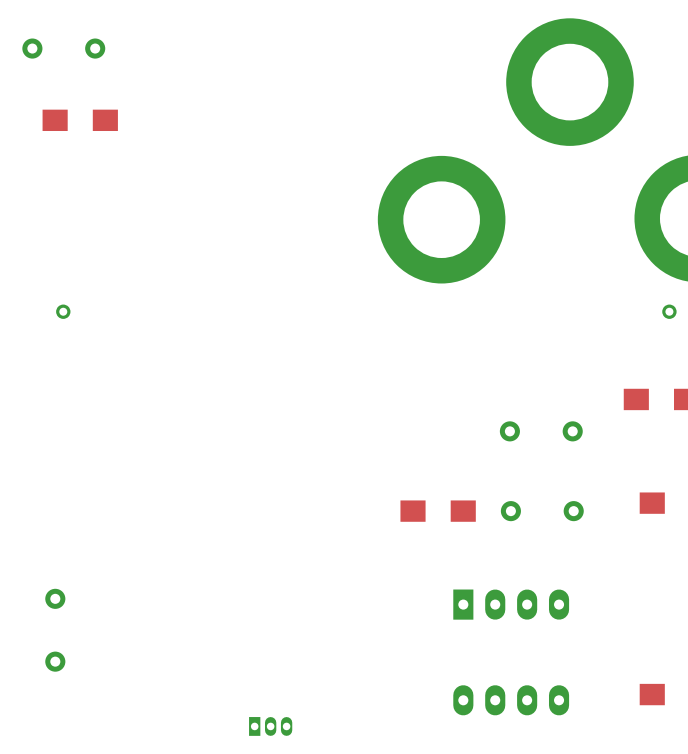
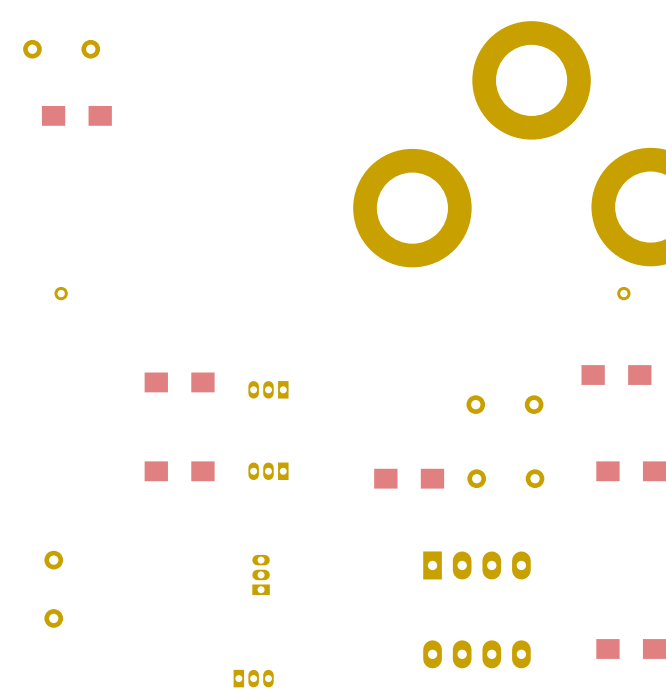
part: none -> (179, 382)
part: none -> (268, 389)
part: none -> (179, 471)
part: none -> (268, 471)
part: none -> (261, 574)

